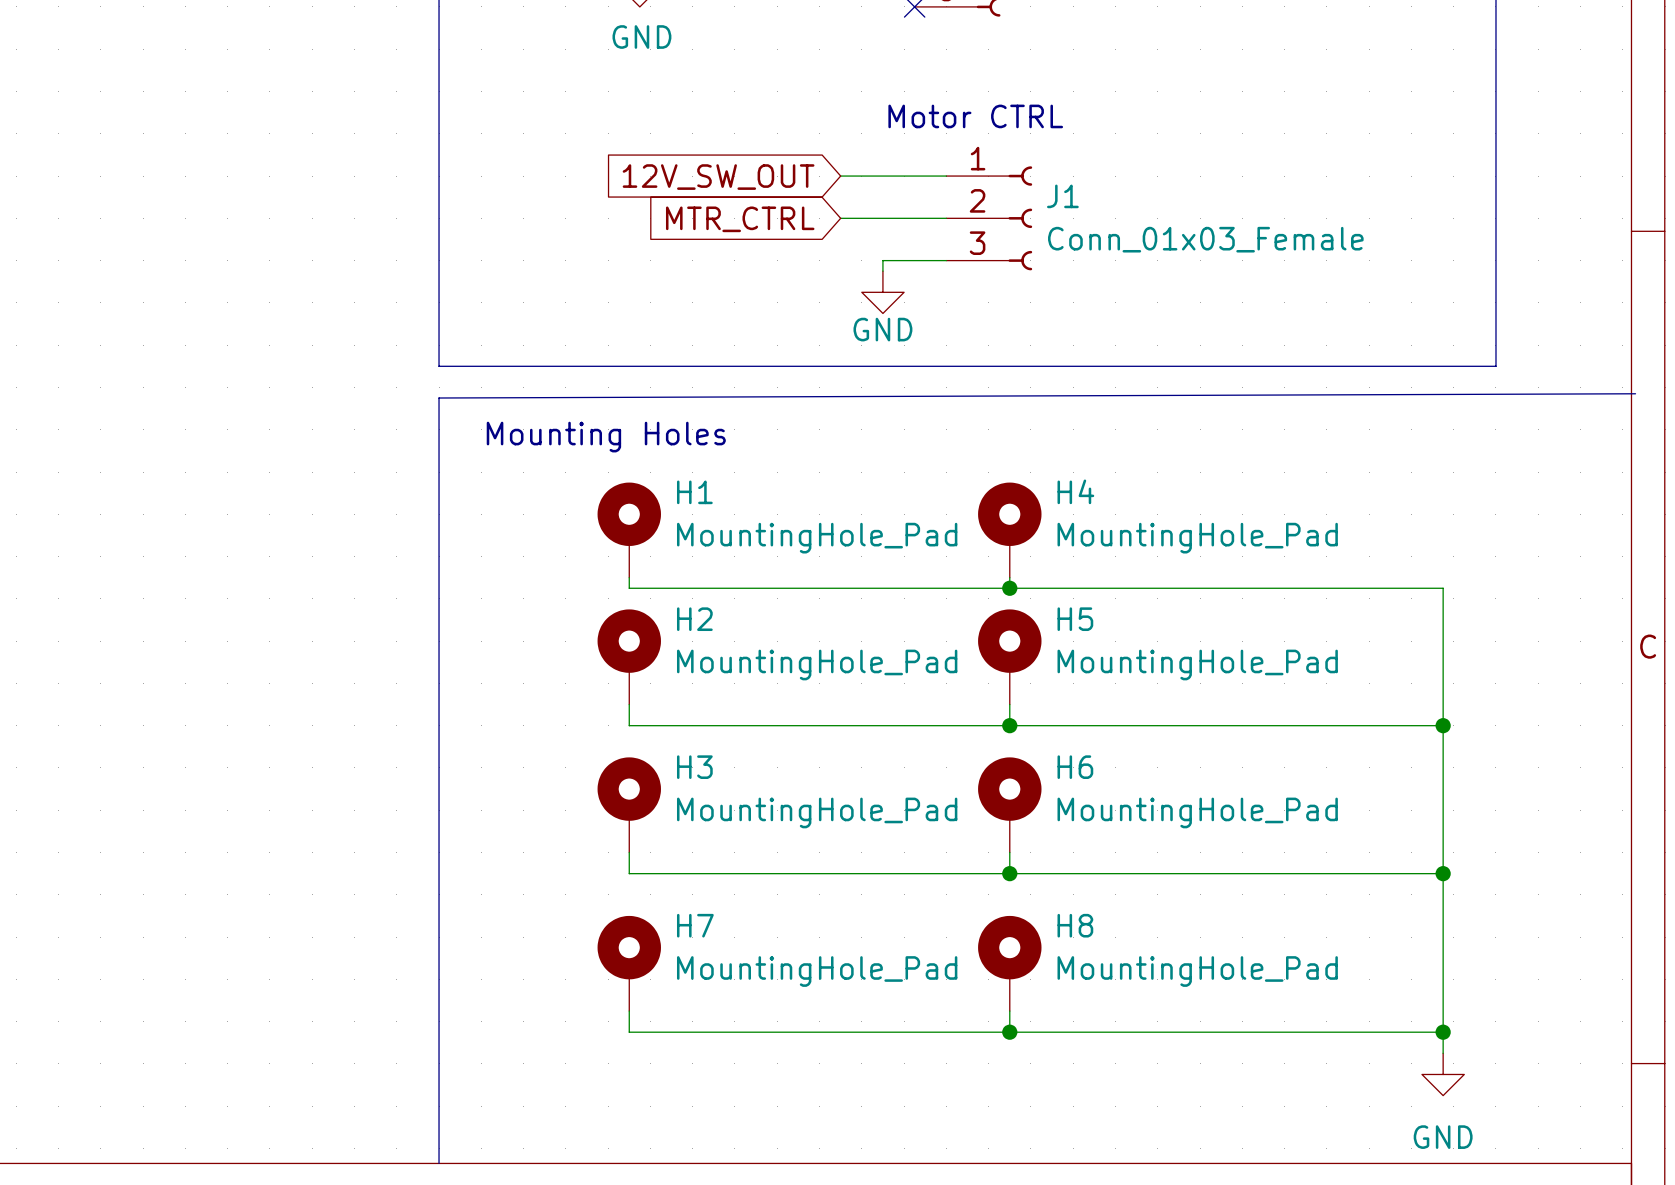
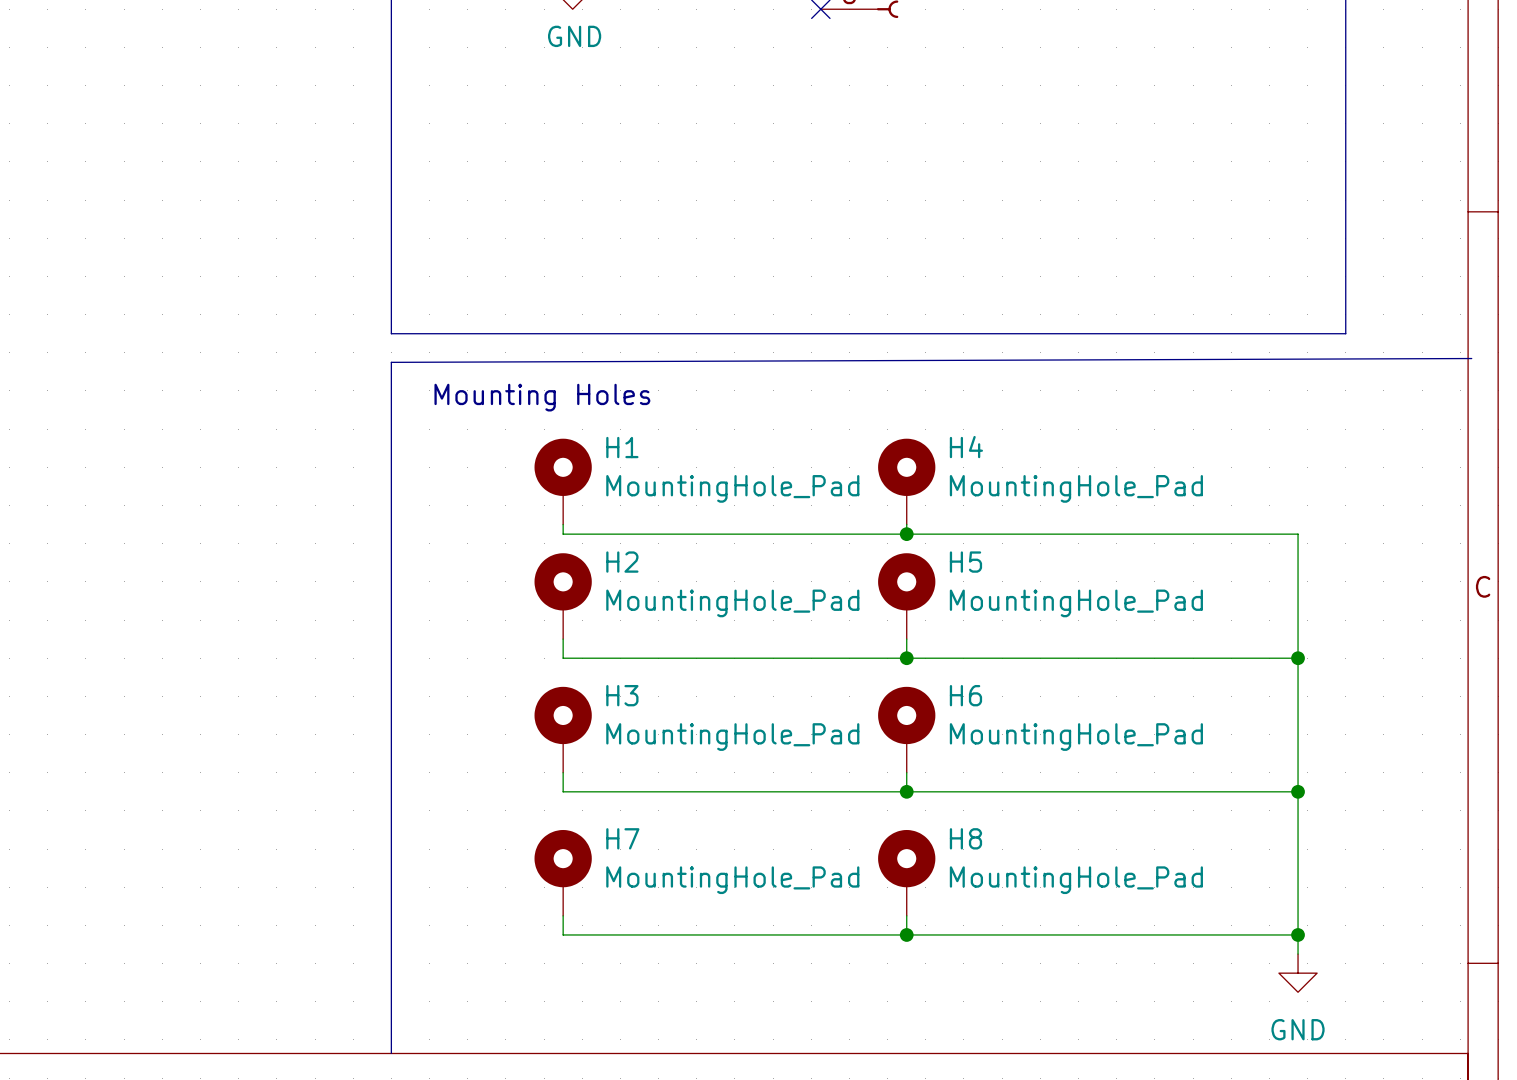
text: Motor CTRL (975, 116) -> none
wire: (840, 176) (946, 176) -> none
global label: 12V_SW_OUT (718, 177) -> none
wire: (840, 218) (946, 218) -> none
J1: Conn_01x03_Female (989, 218) -> none
global label: MTR_CTRL (740, 219) -> none
wire: (946, 260) (882, 260) (882, 271) -> none
power symbol: GND (882, 292) -> none

